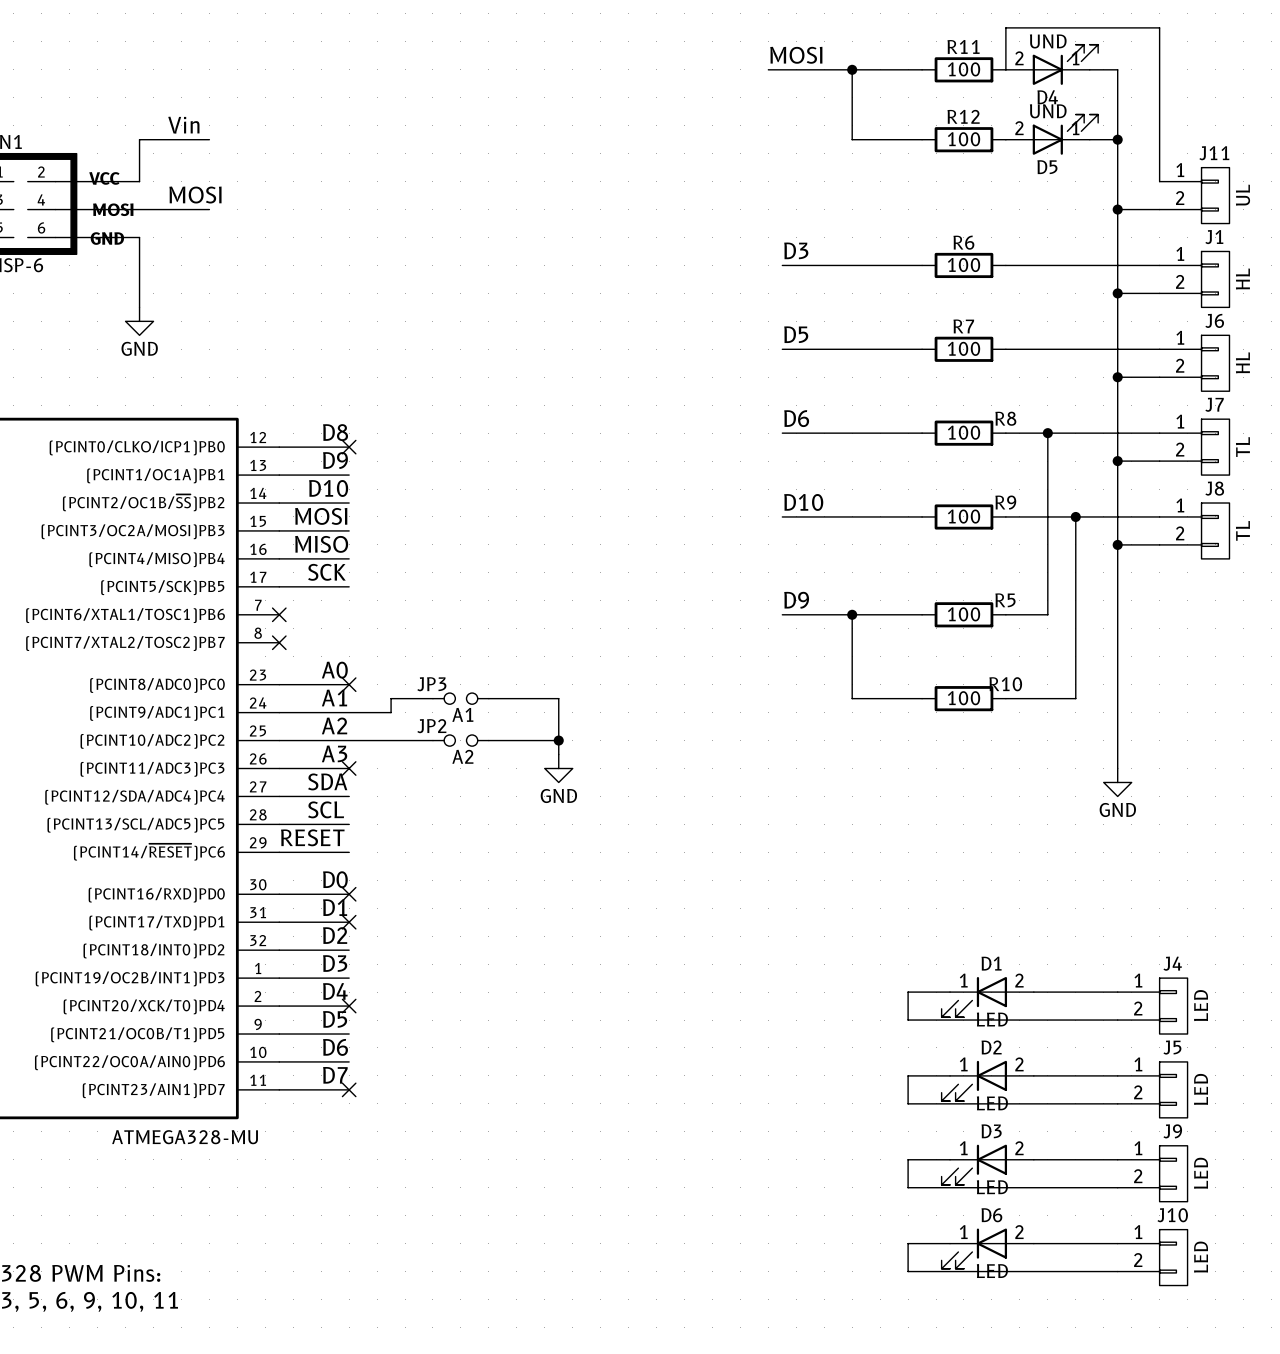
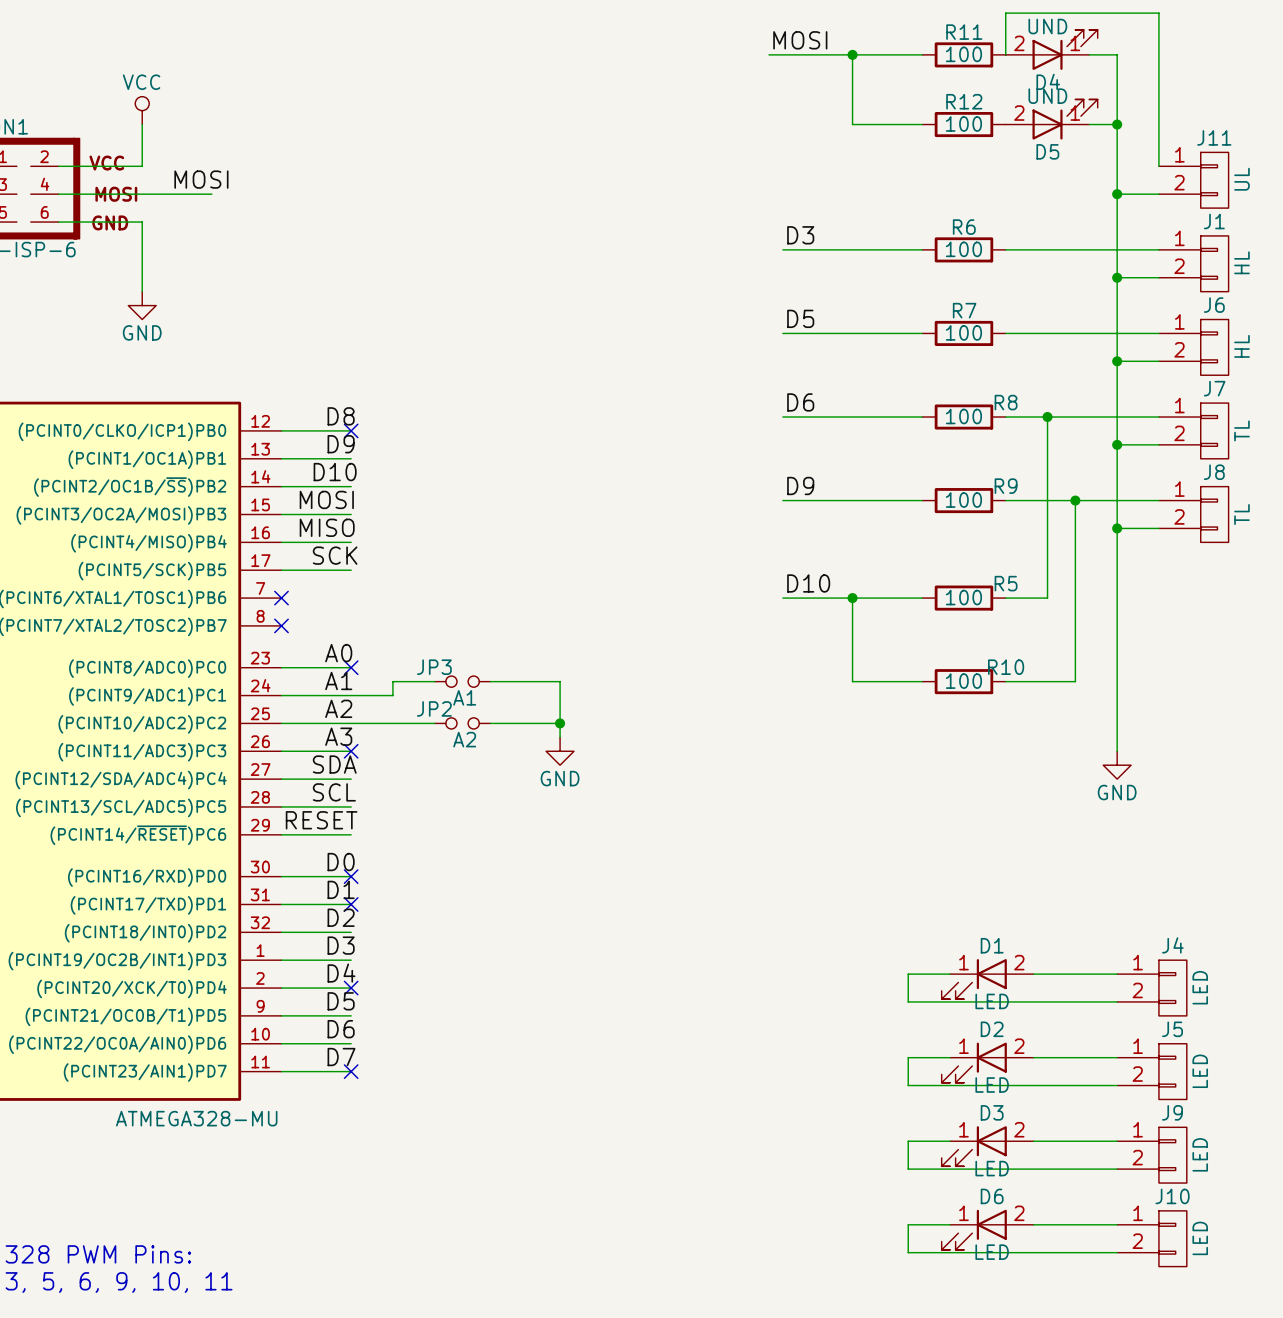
power symbol: none -> VCC (142, 110)
label: Vin (183, 125) -> none
wire: (139, 139) (209, 139) -> none
label: D10 (803, 502) -> D9 (800, 485)
label: D9 (796, 600) -> D10 (808, 583)

